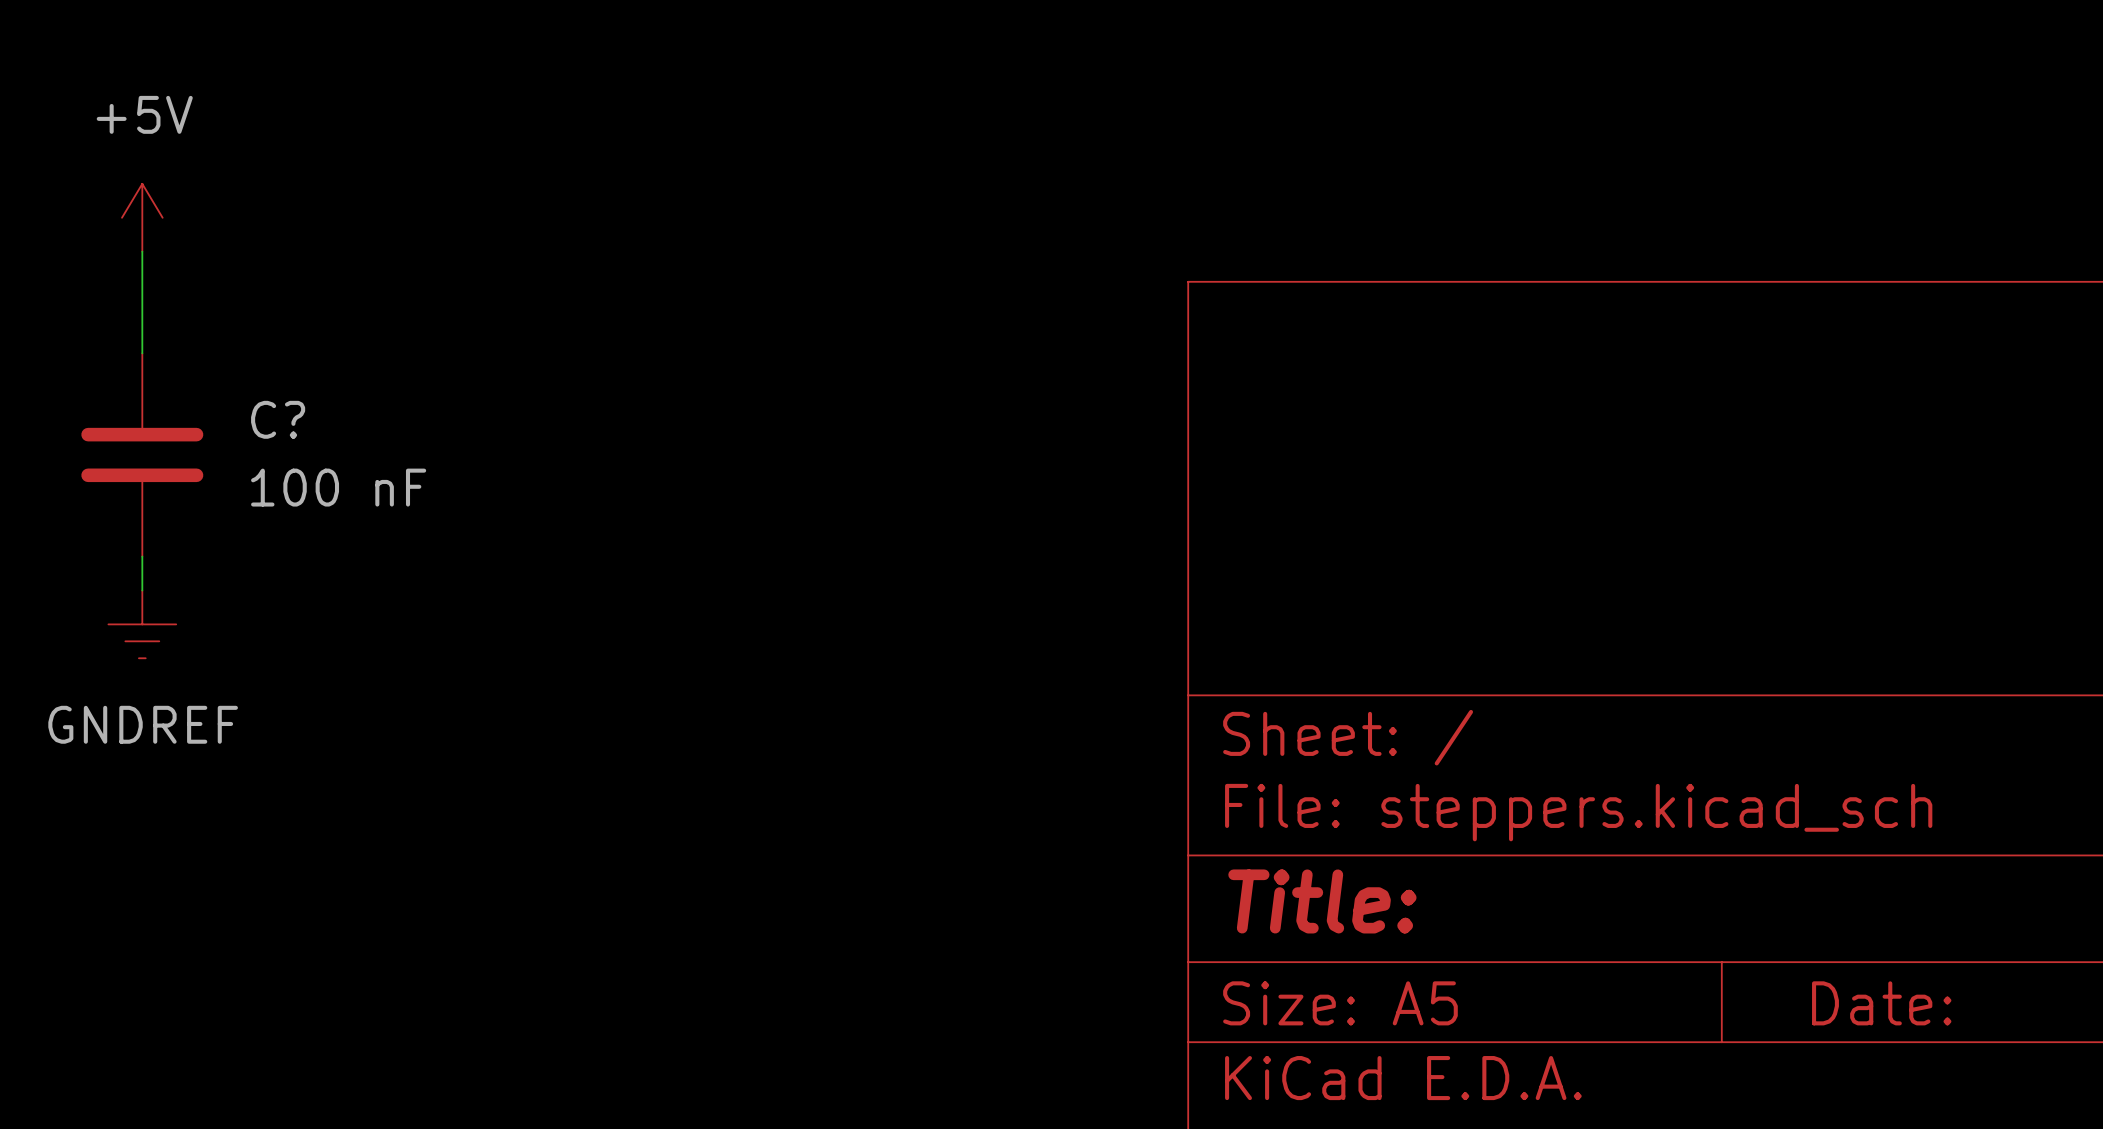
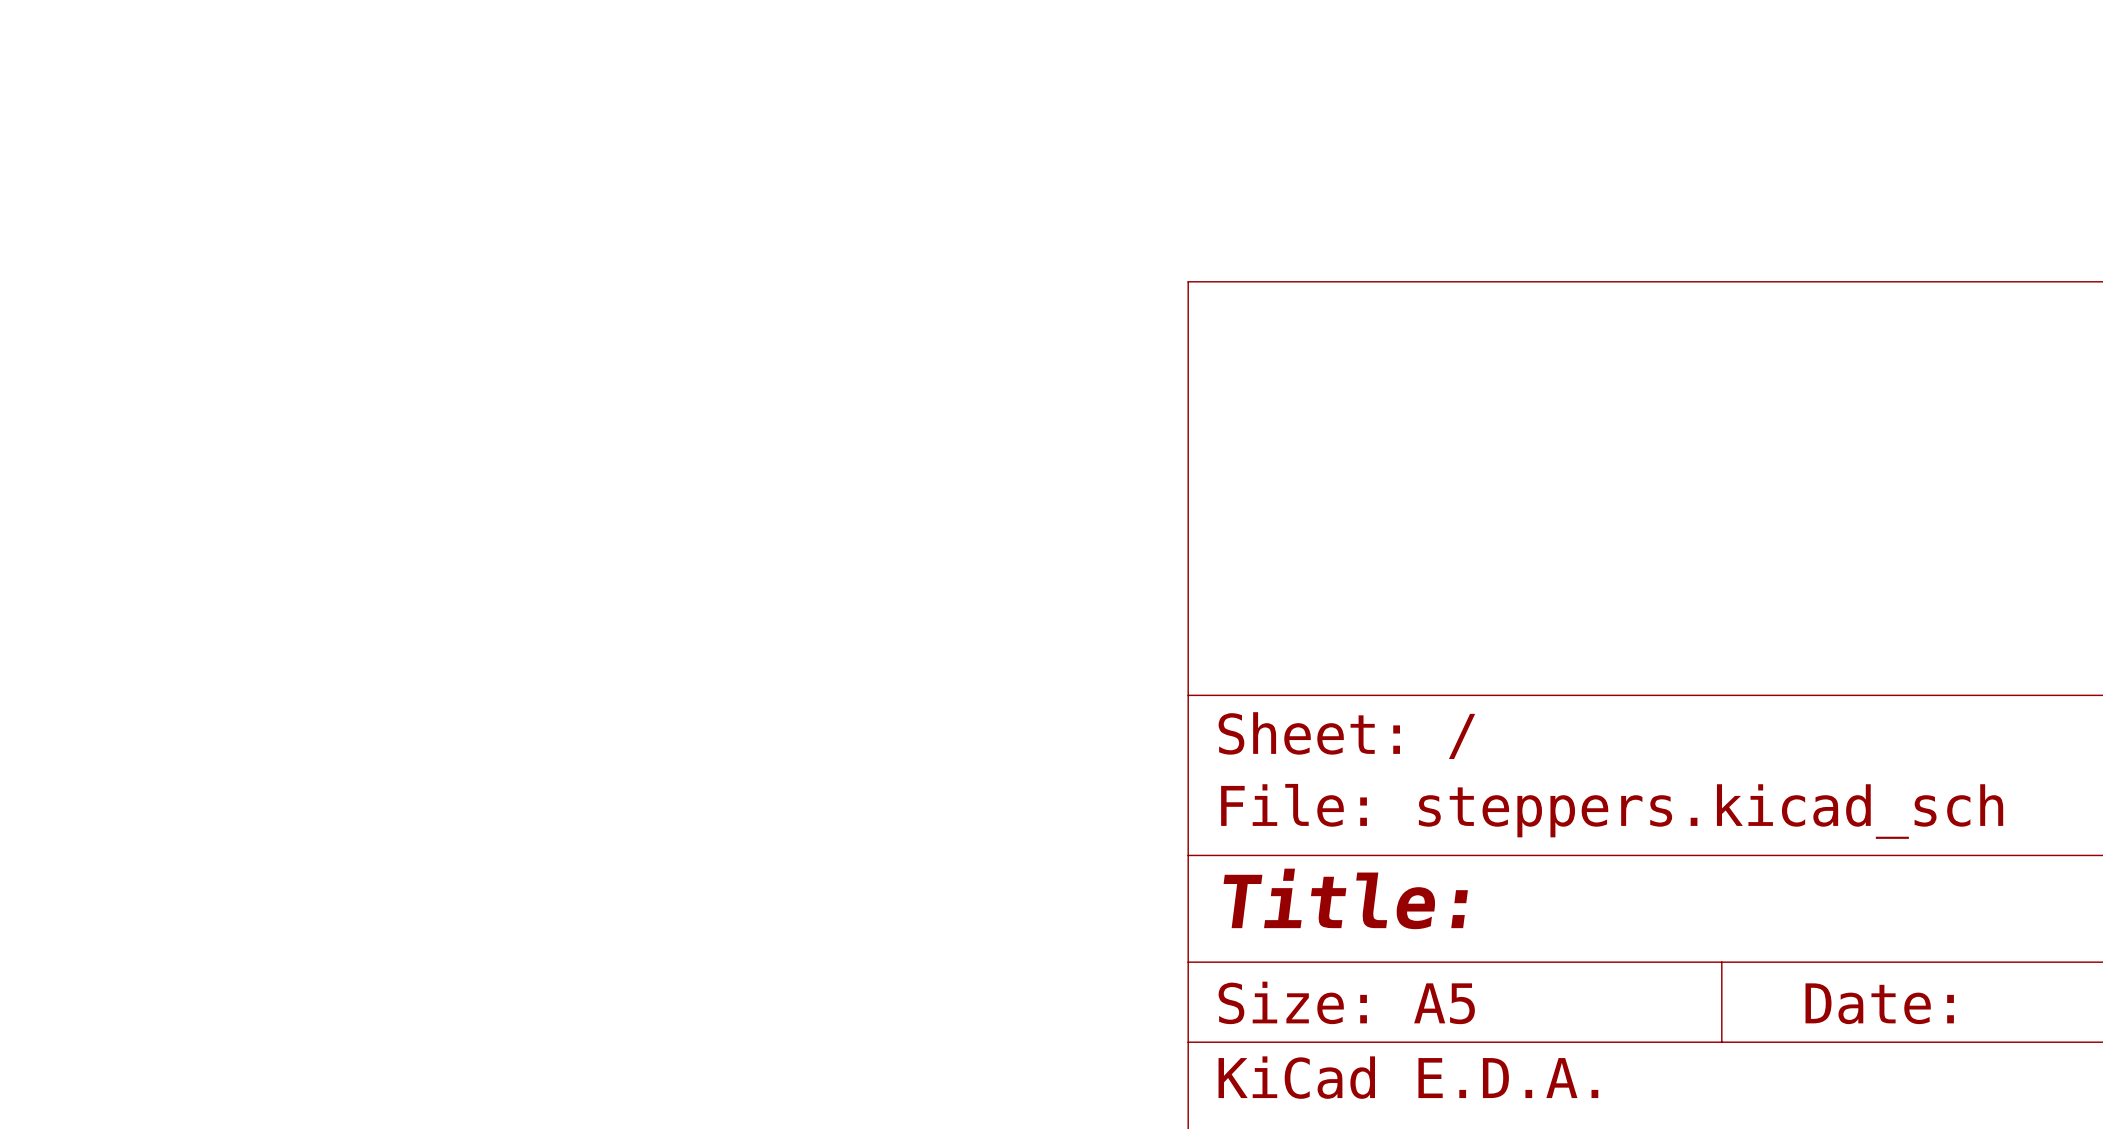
power symbol: +5V (142, 217) -> none
wire: (142, 251) (142, 353) -> none
C?: 100 nF (142, 454) -> none
wire: (142, 556) (142, 590) -> none
power symbol: GNDREF (142, 624) -> none

